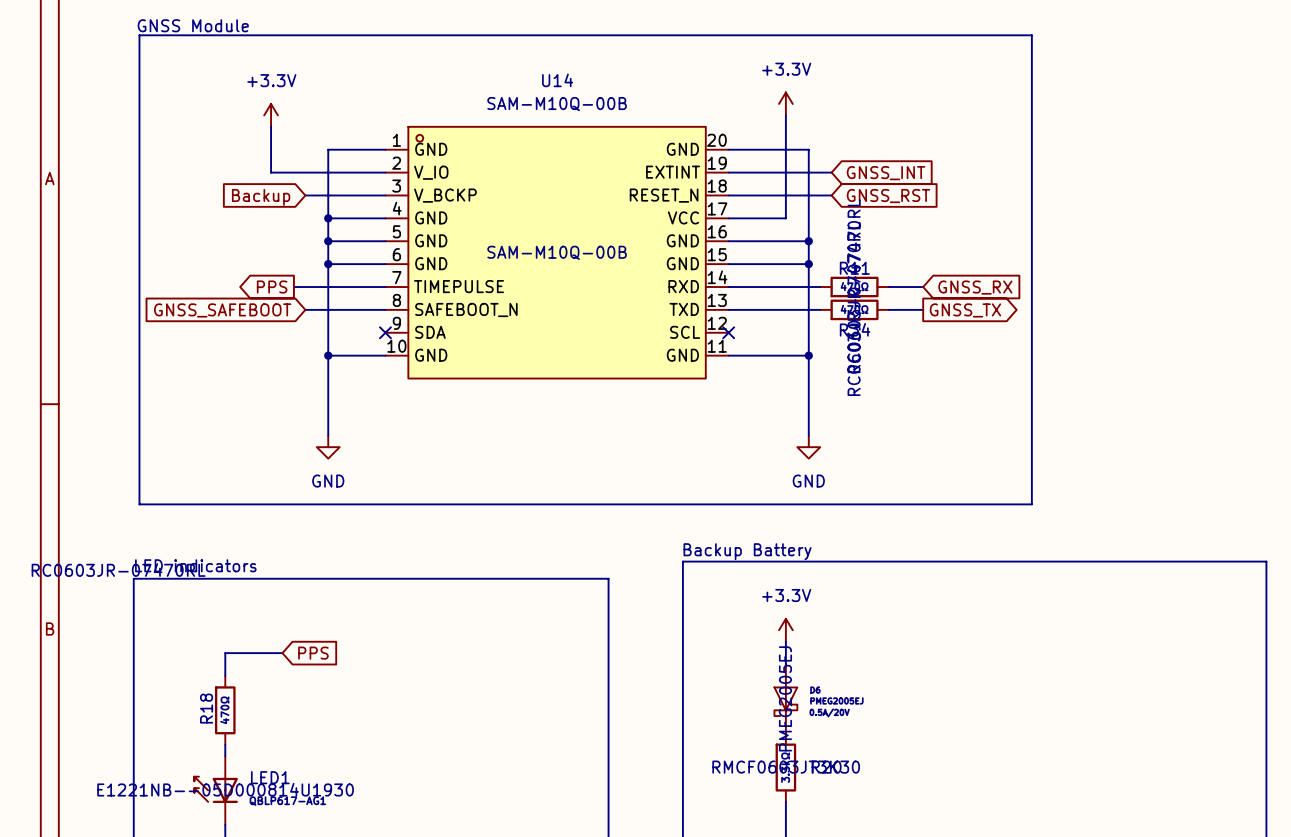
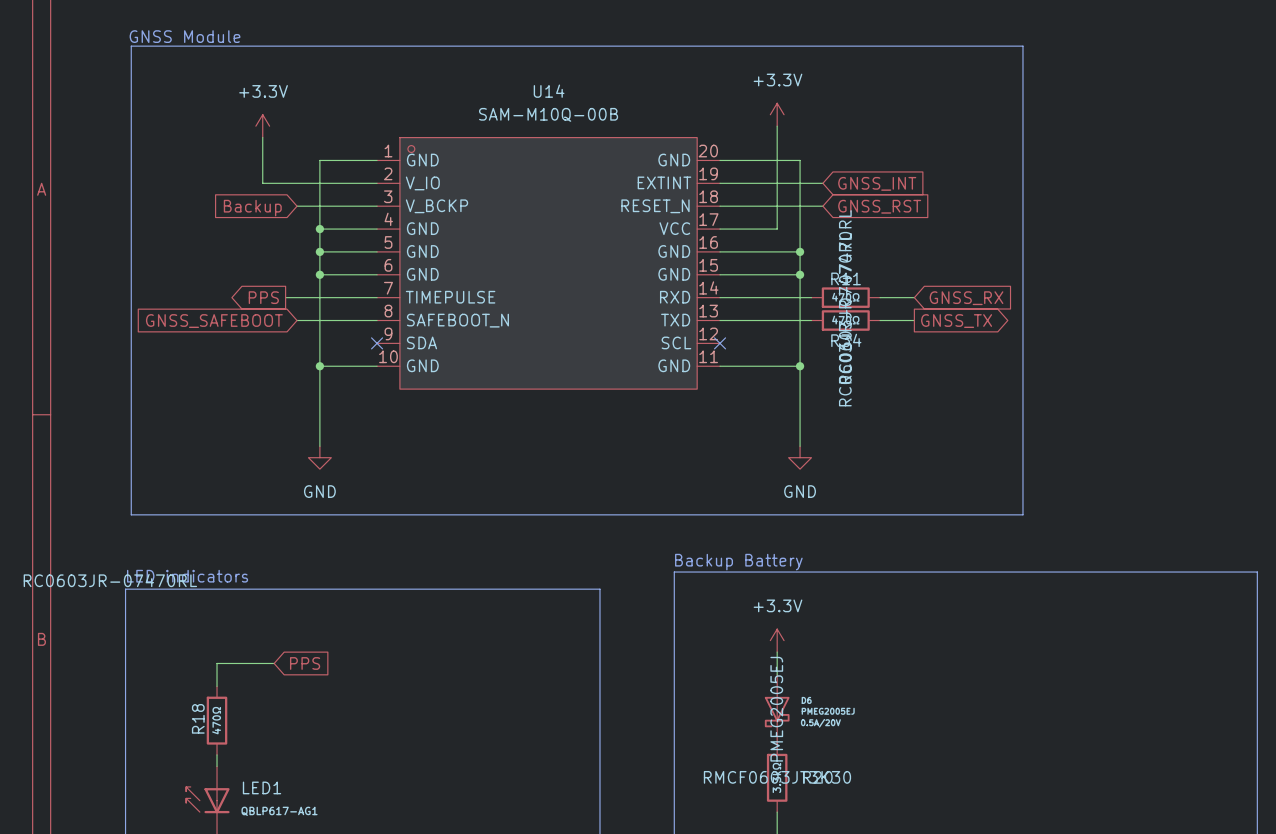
U14 text: SAM-M10Q-00B (557, 252) -> none
LED1 text: E1221NB--05D000814U1930 (225, 789) -> none

